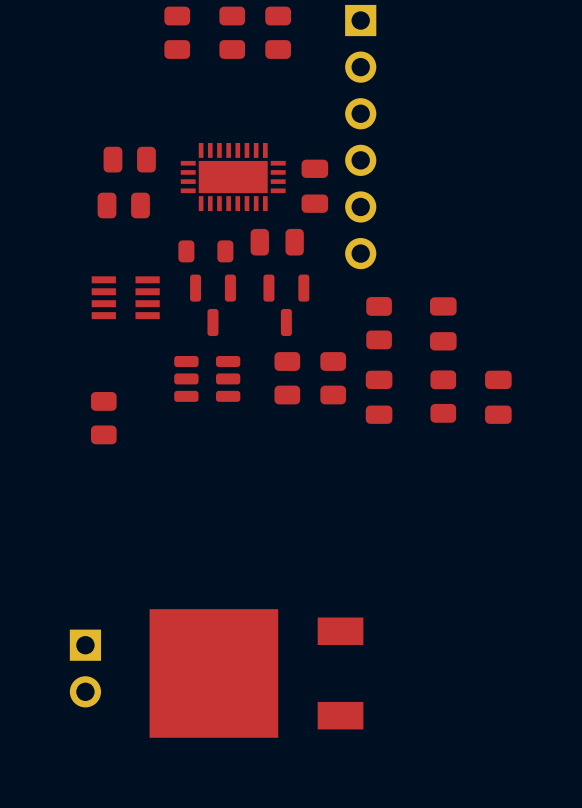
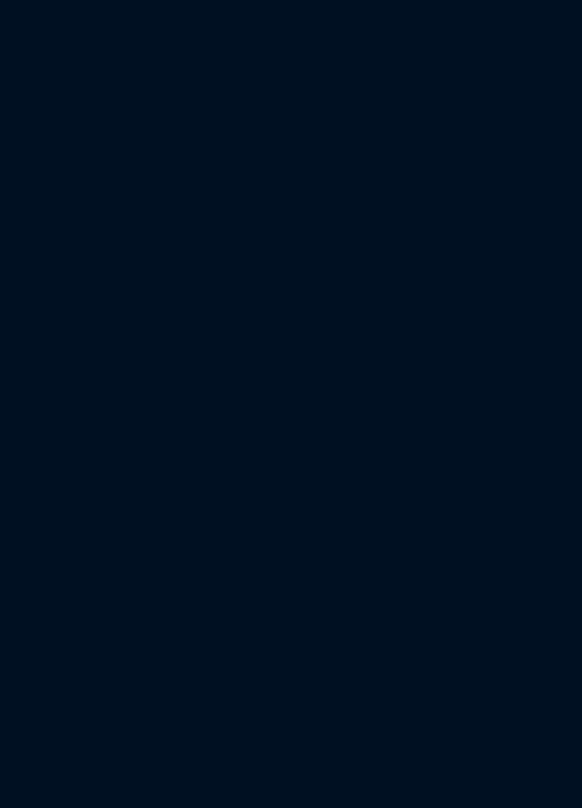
part: (177, 32) -> none
part: (232, 32) -> none
part: (278, 32) -> none
part: (360, 137) -> none
part: (129, 159) -> none
part: (233, 177) -> none
part: (314, 186) -> none
part: (123, 205) -> none
part: (277, 242) -> none
part: (205, 251) -> none
part: (125, 297) -> none
part: (212, 305) -> none
part: (286, 305) -> none
part: (379, 323) -> none
part: (443, 323) -> none
part: (207, 378) -> none
part: (287, 378) -> none
part: (333, 378) -> none
part: (443, 396) -> none
part: (379, 397) -> none
part: (498, 397) -> none
part: (103, 418) -> none
part: (85, 668) -> none
part: (256, 673) -> none

